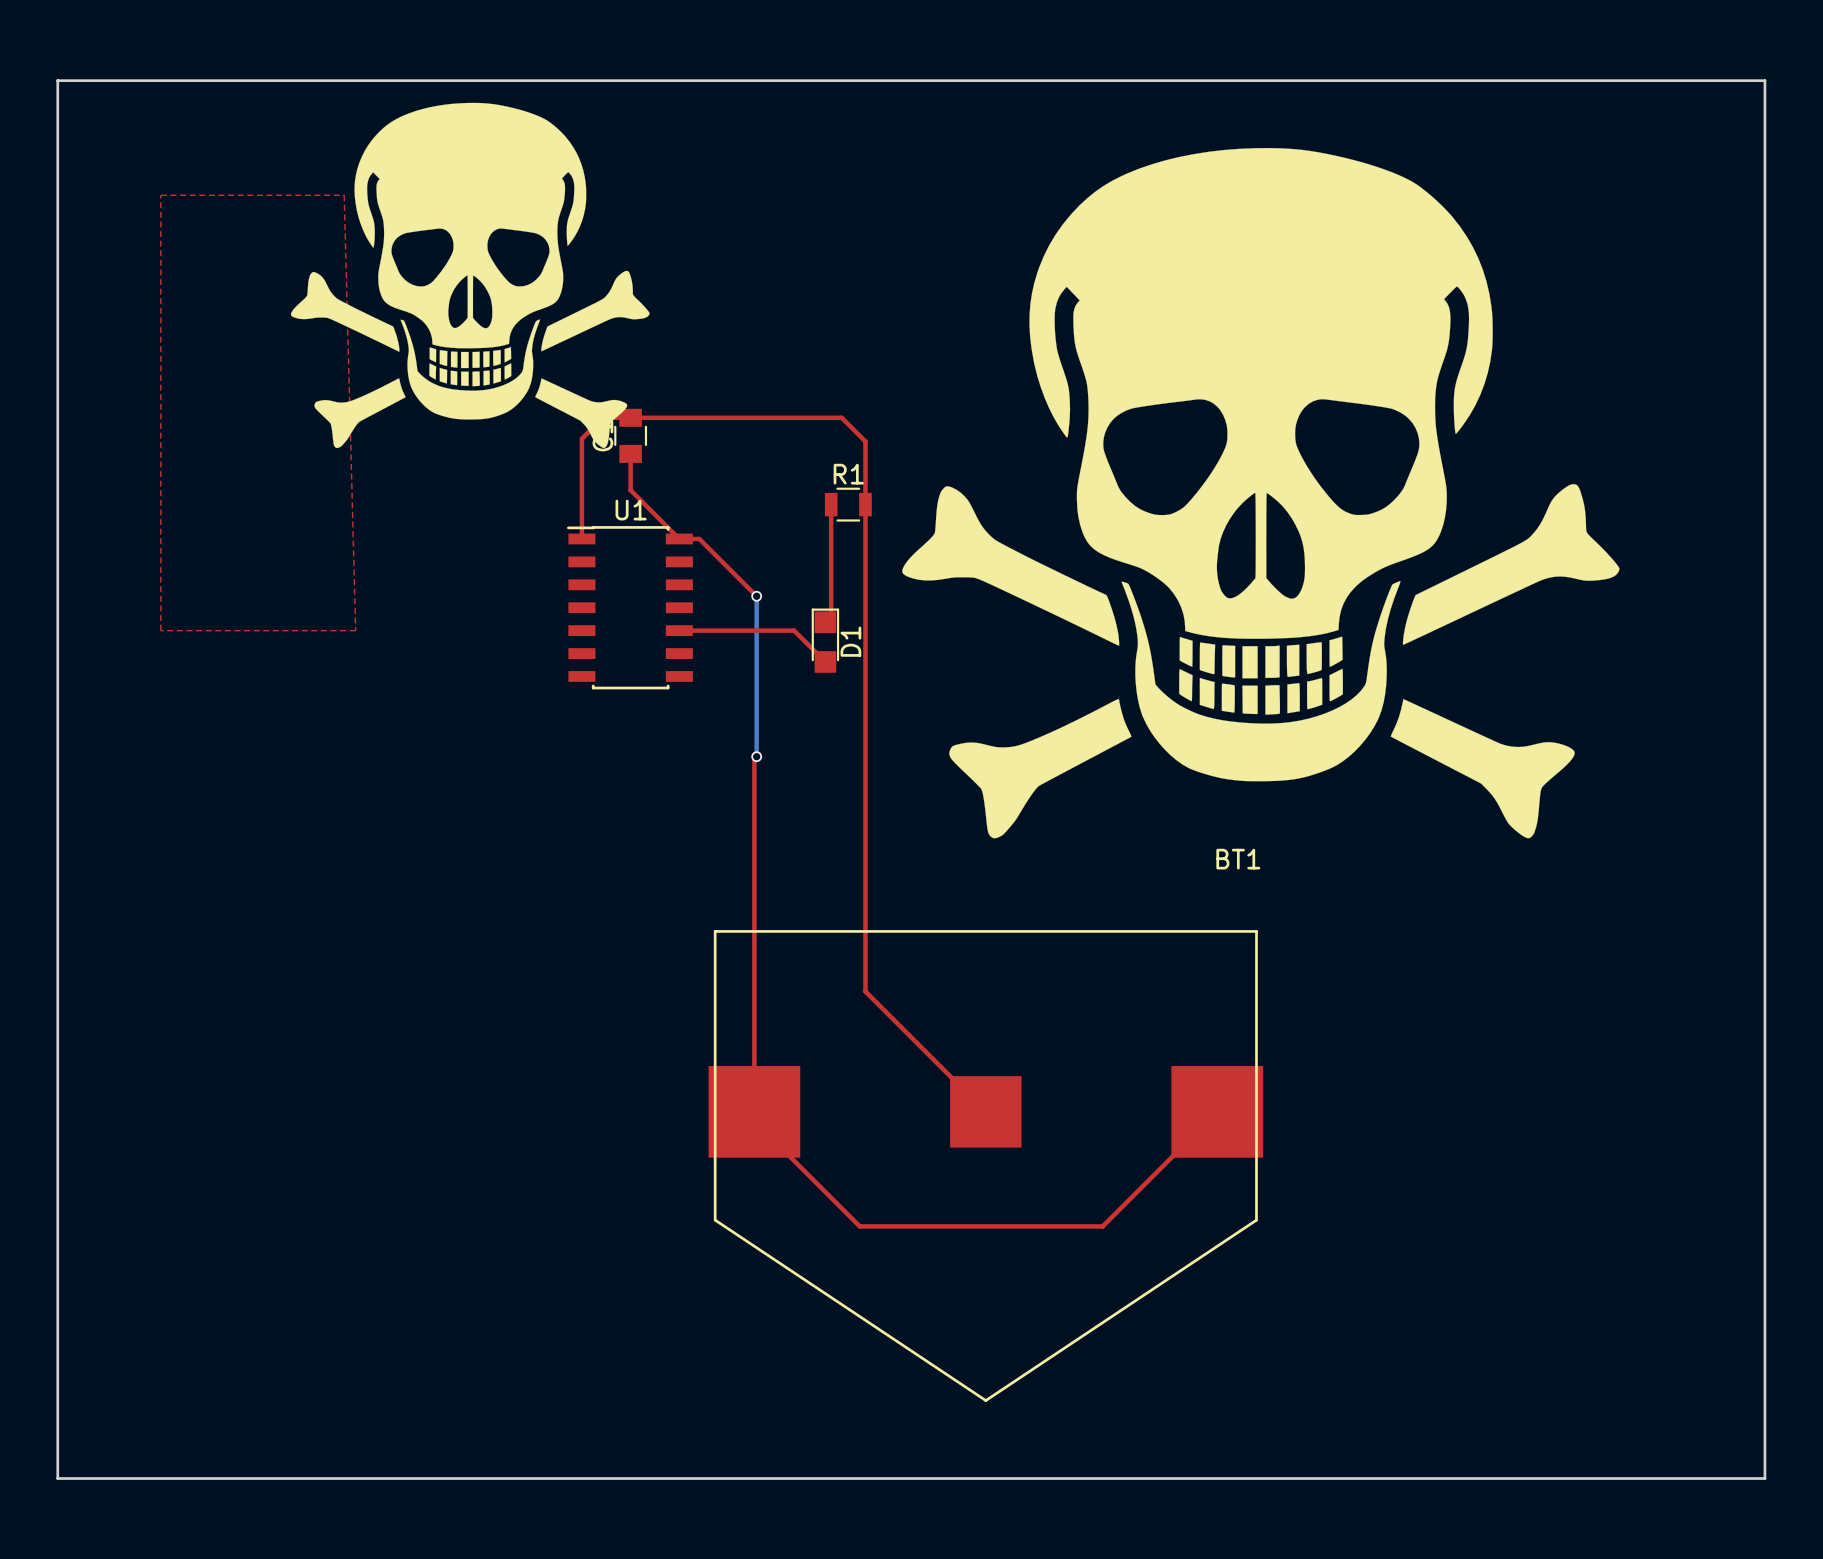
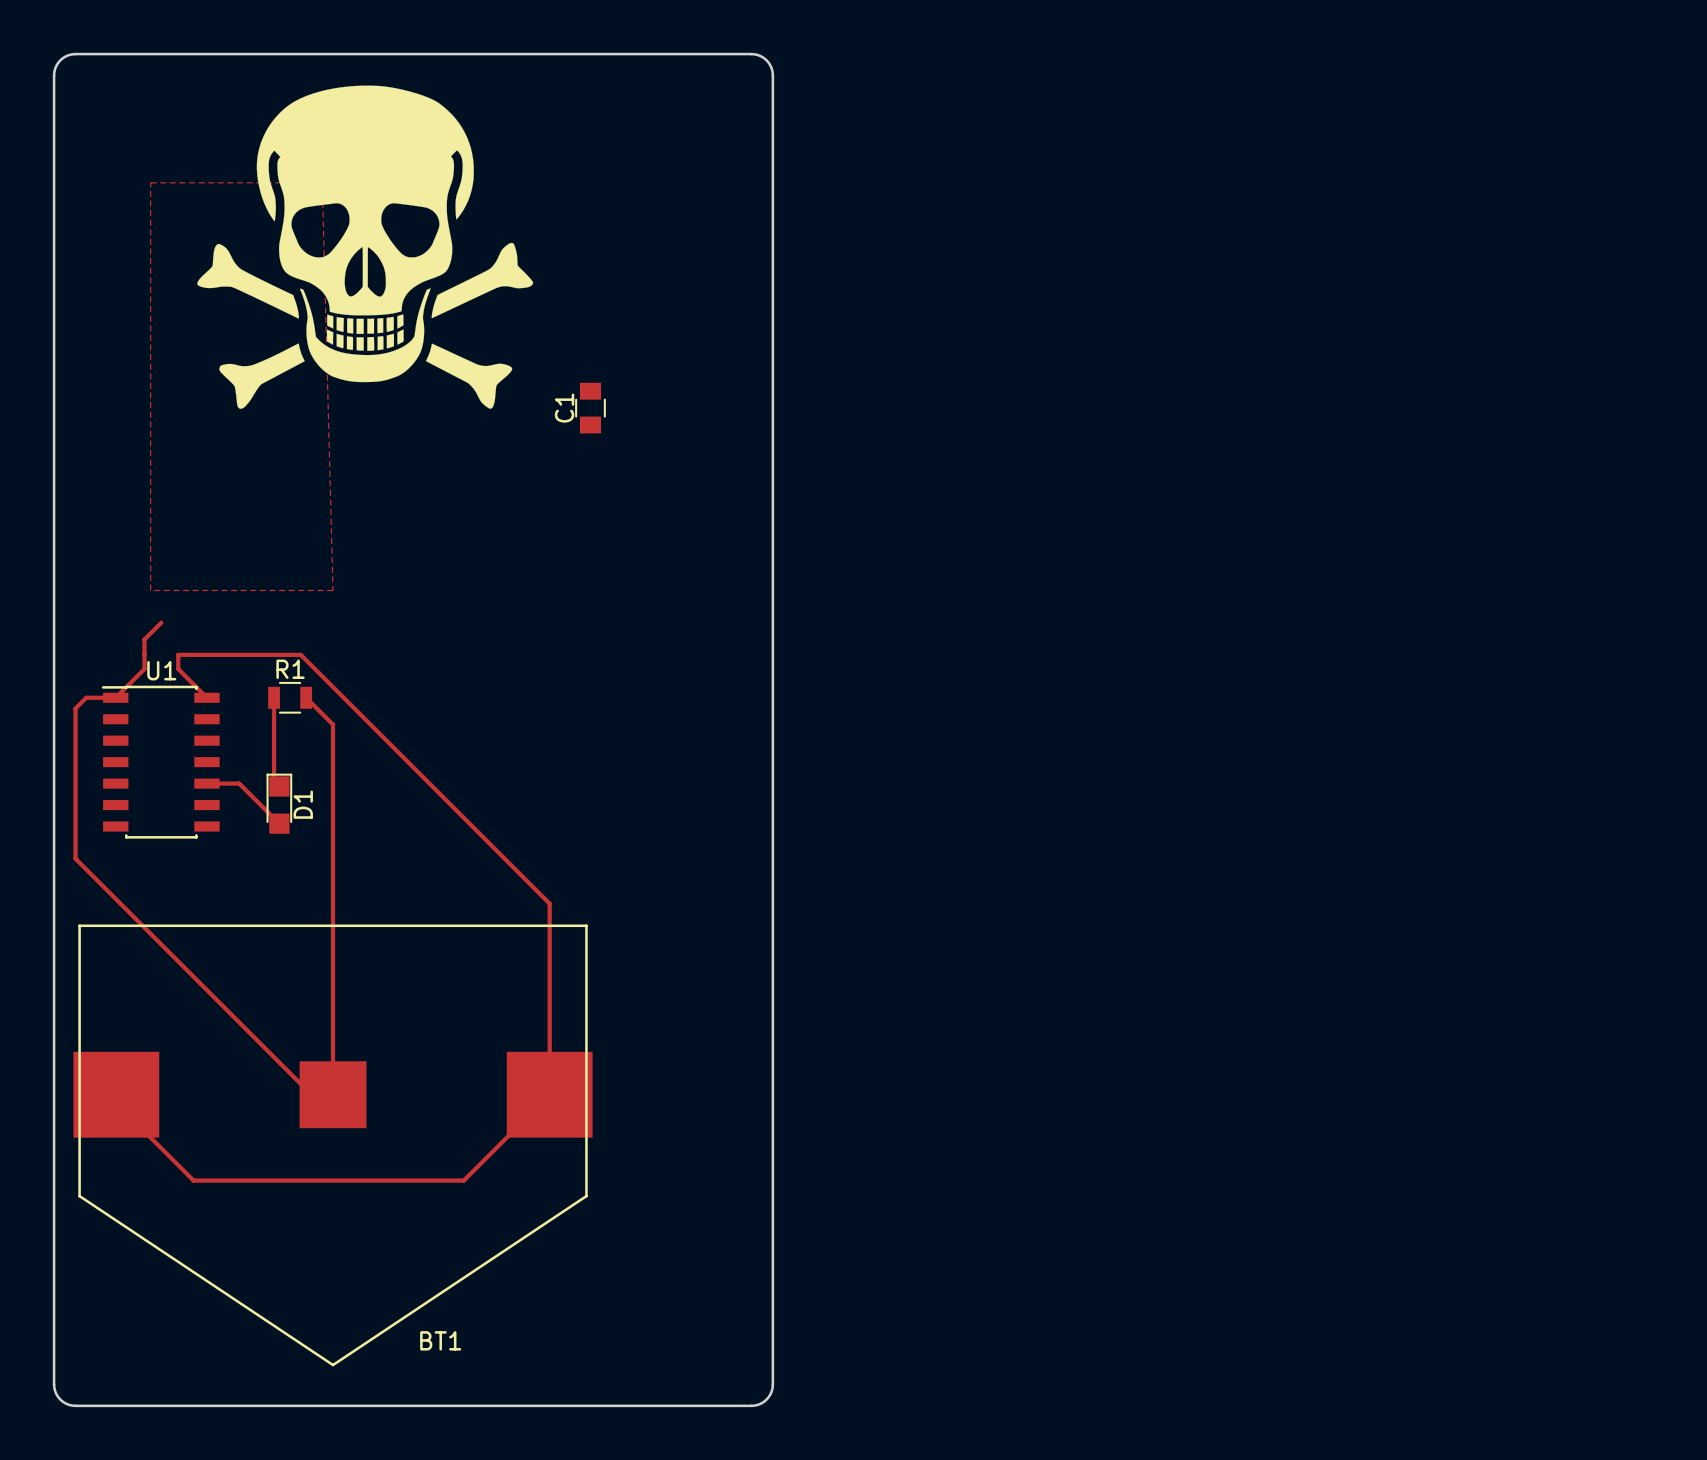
board edge: (57, 80) (1764, 80) (1764, 1478) (57, 1478) -> (54, 75) (55, 67) (60, 60) (67, 55) (75, 54) (751, 54) (762, 56) (770, 64) (772, 75) (772, 1384) (771, 1392) (766, 1399) (759, 1404) (751, 1405) (75, 1405) (67, 1404) (60, 1399) (55, 1392) (54, 1384)
drawing: [902, 148, 1620, 839] -> none
drawing position: (470, 275) -> (365, 247)
top track: (630, 453) (630, 490) (679, 538) (699, 538) (756, 596) -> none
top track: (831, 504) (831, 616) (825, 622) -> none
R1 position: (848, 504) -> (290, 697)
top track: (581, 538) (581, 438) (602, 417) (841, 417) (865, 441) (865, 991) (985, 1111) -> none
bottom track: (756, 596) (756, 756) -> none
via: (756, 596) -> none
U1 position: (629, 607) -> (160, 762)
top track: (679, 630) (794, 630) (825, 661) -> none
D1 position: (825, 640) -> (279, 803)
top track: none -> (161, 622) (144, 639) (144, 669) (115, 697) (86, 697) (75, 708) (75, 858) (311, 1094) (333, 1094) (333, 724) (306, 697)
top track: none -> (206, 697) (178, 669) (178, 654) (300, 654) (549, 903) (549, 1094) (463, 1180) (193, 1180) (116, 1103) (116, 1094)
top track: none -> (274, 697) (274, 781) (279, 786)
top track: (756, 756) (754, 758) (754, 1121) (859, 1226) (1102, 1226) (1217, 1111) -> none
via: (756, 756) -> none
top track: none -> (206, 783) (239, 783) (279, 823)
BT1 name position: BT1 (1238, 859) -> BT1 (440, 1340)
BT1 position: (985, 1165) -> (333, 1145)

